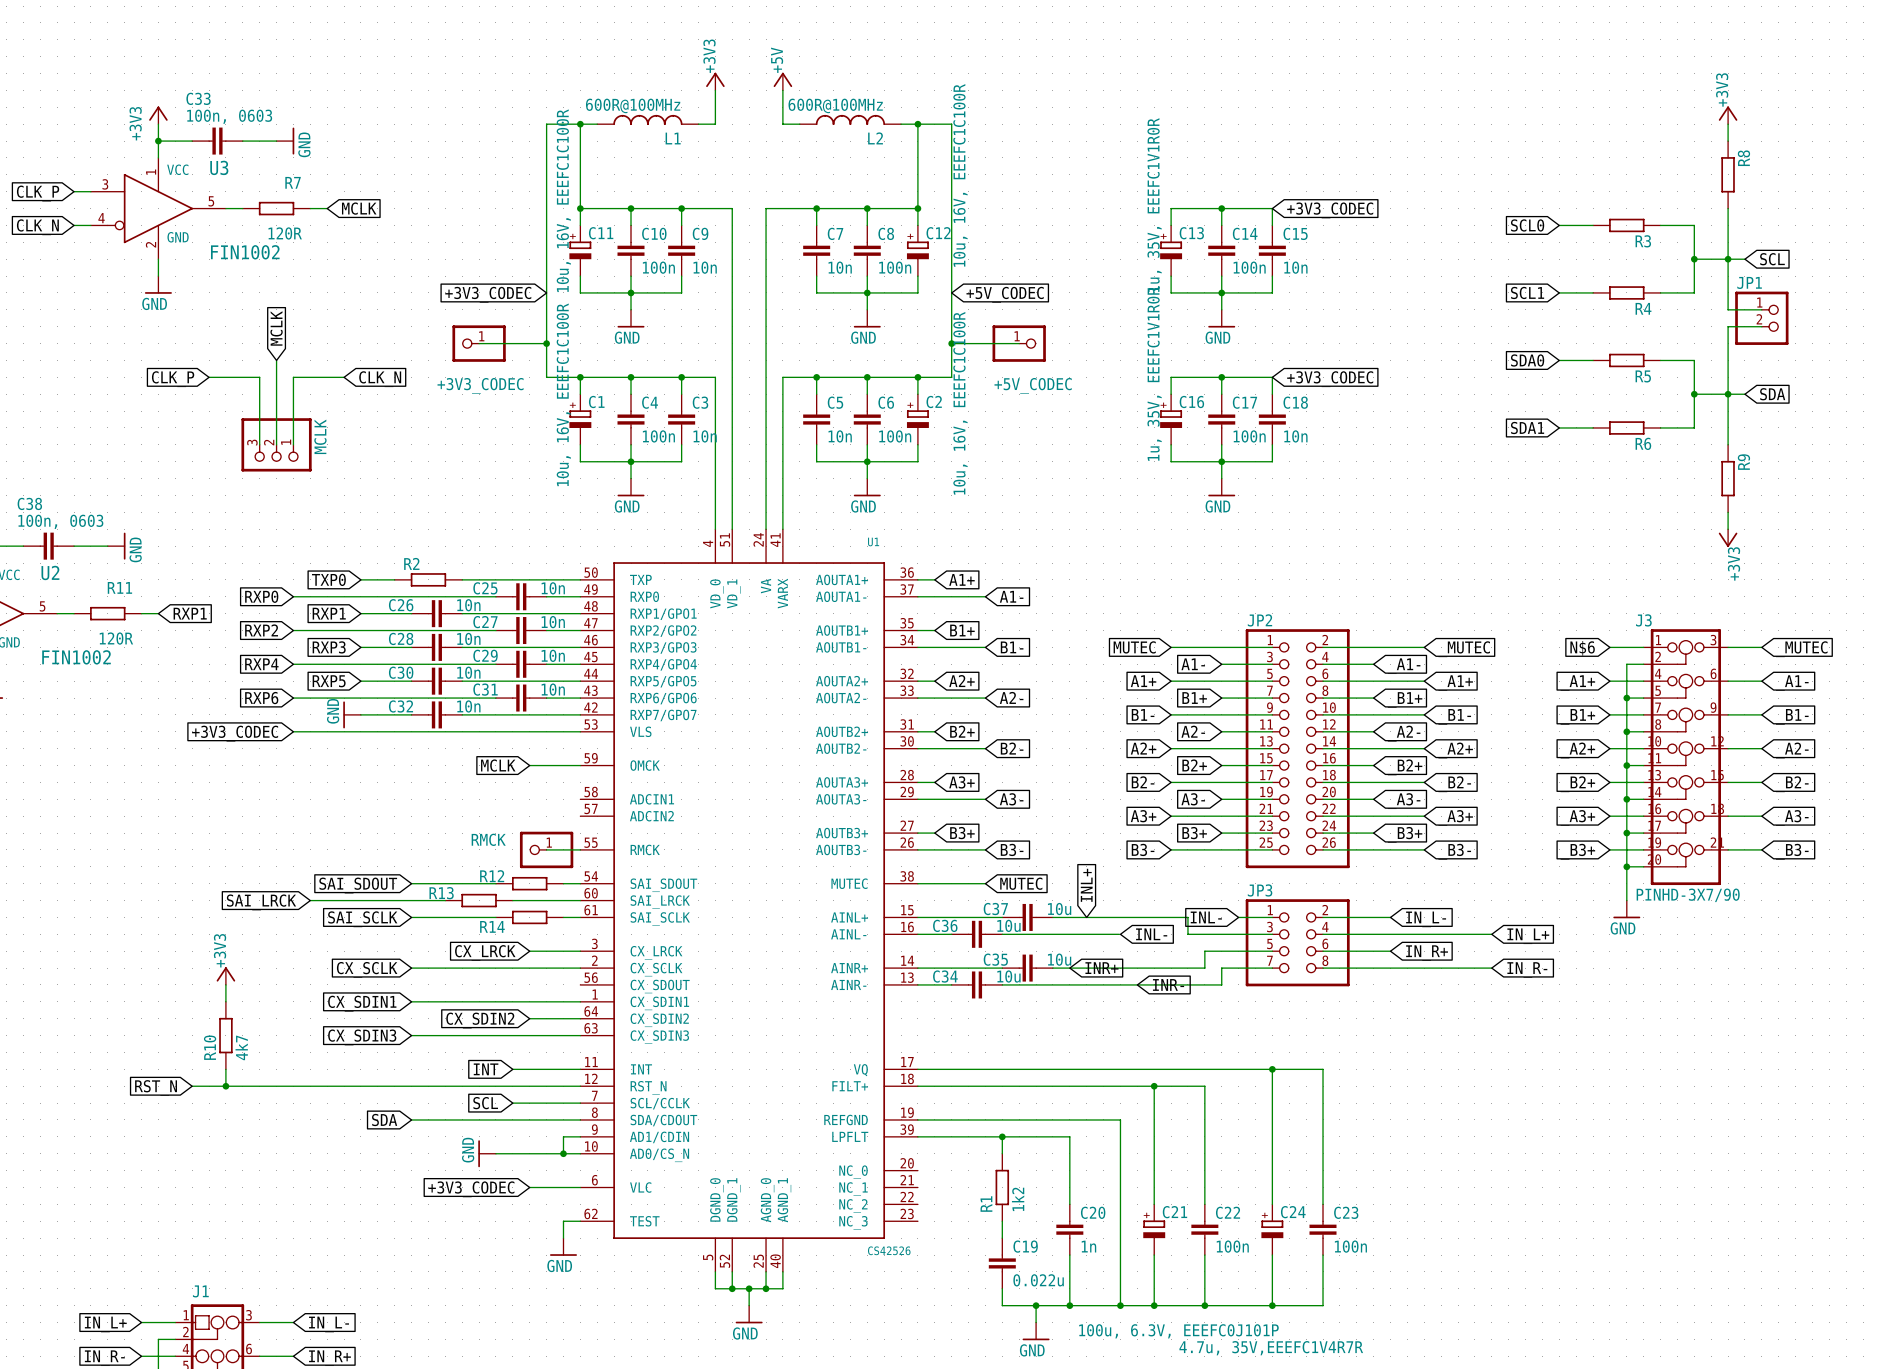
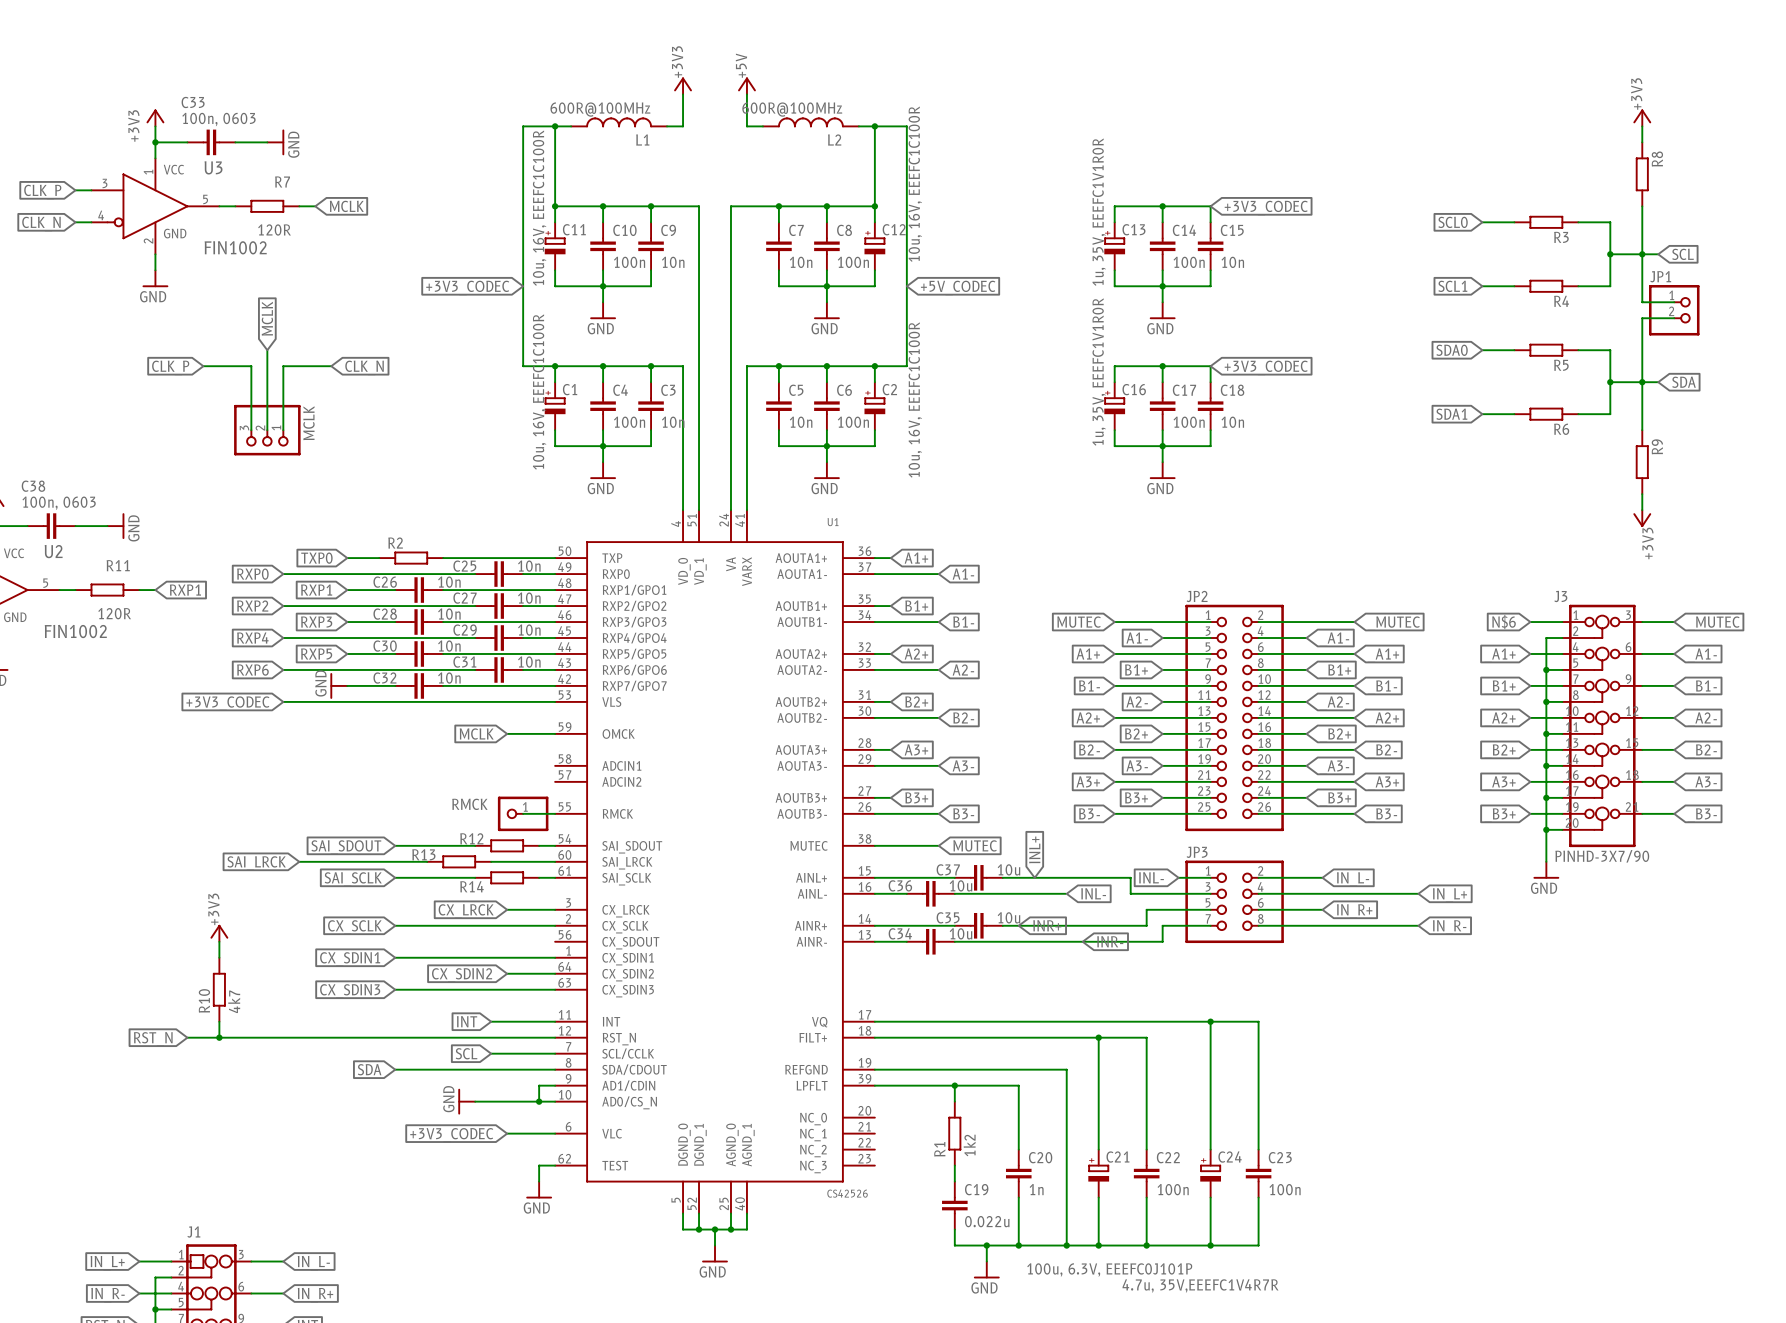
wire: (479, 343) (546, 343) -> none
+3V3_CODEC: (479, 343) -> none
junction: (546, 343) -> none
wire: (951, 343) (1019, 343) -> none
junction: (951, 343) -> none
+5V_CODEC: (1019, 343) -> none

